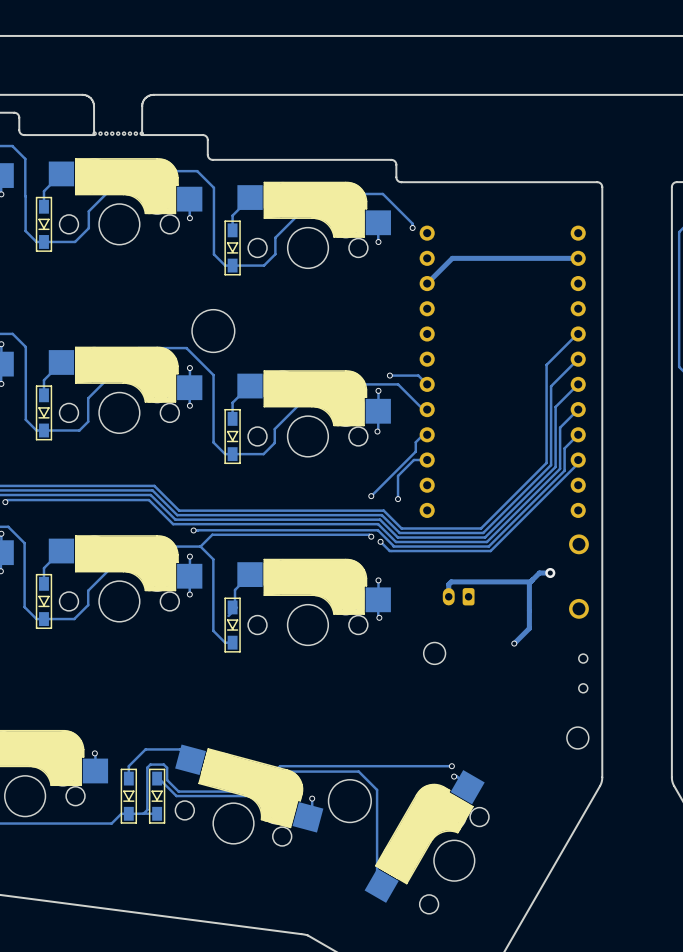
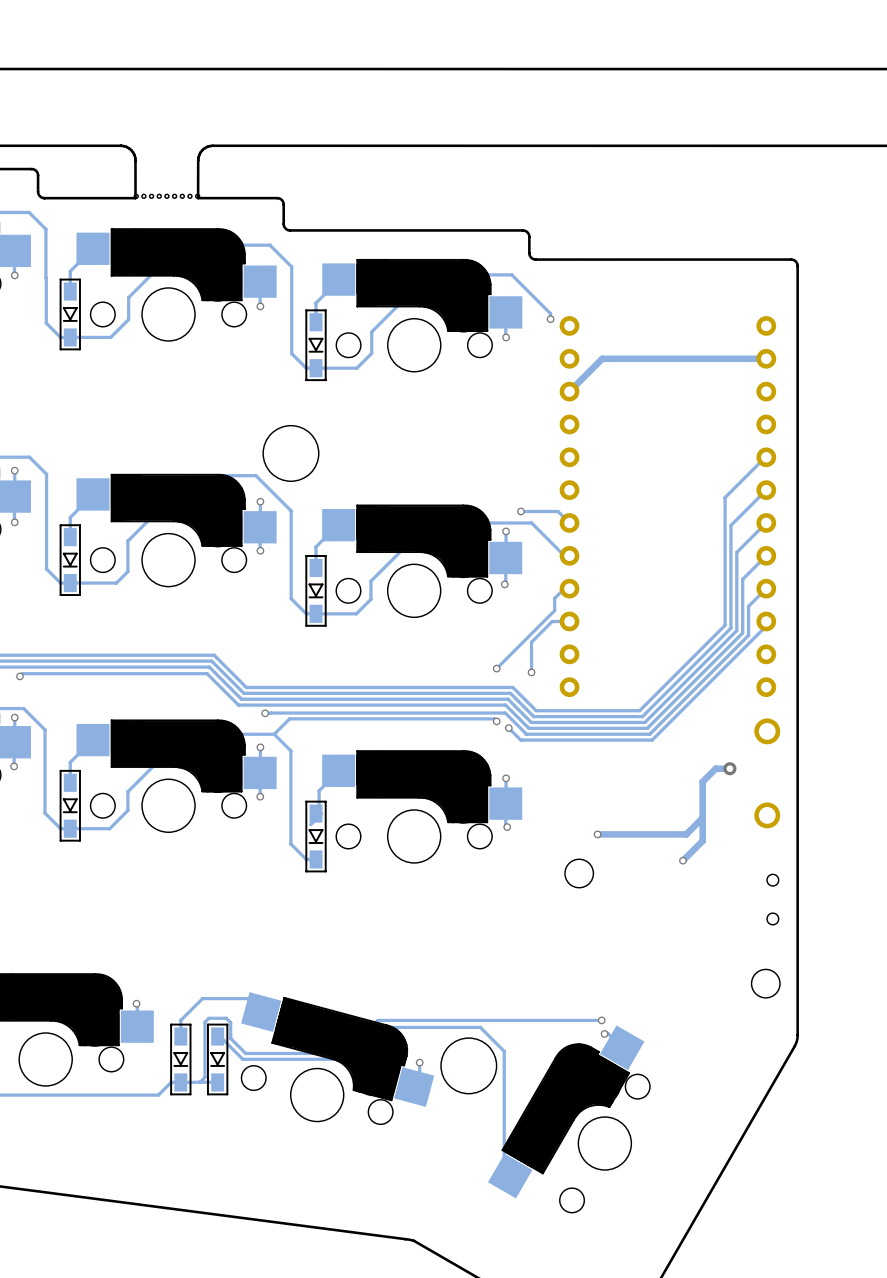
track: (530, 581) (451, 581) (448, 584) (448, 596) -> none
part: (458, 596) -> none
track: none -> (702, 817) (686, 834) (597, 834)
via: none -> (597, 834)

